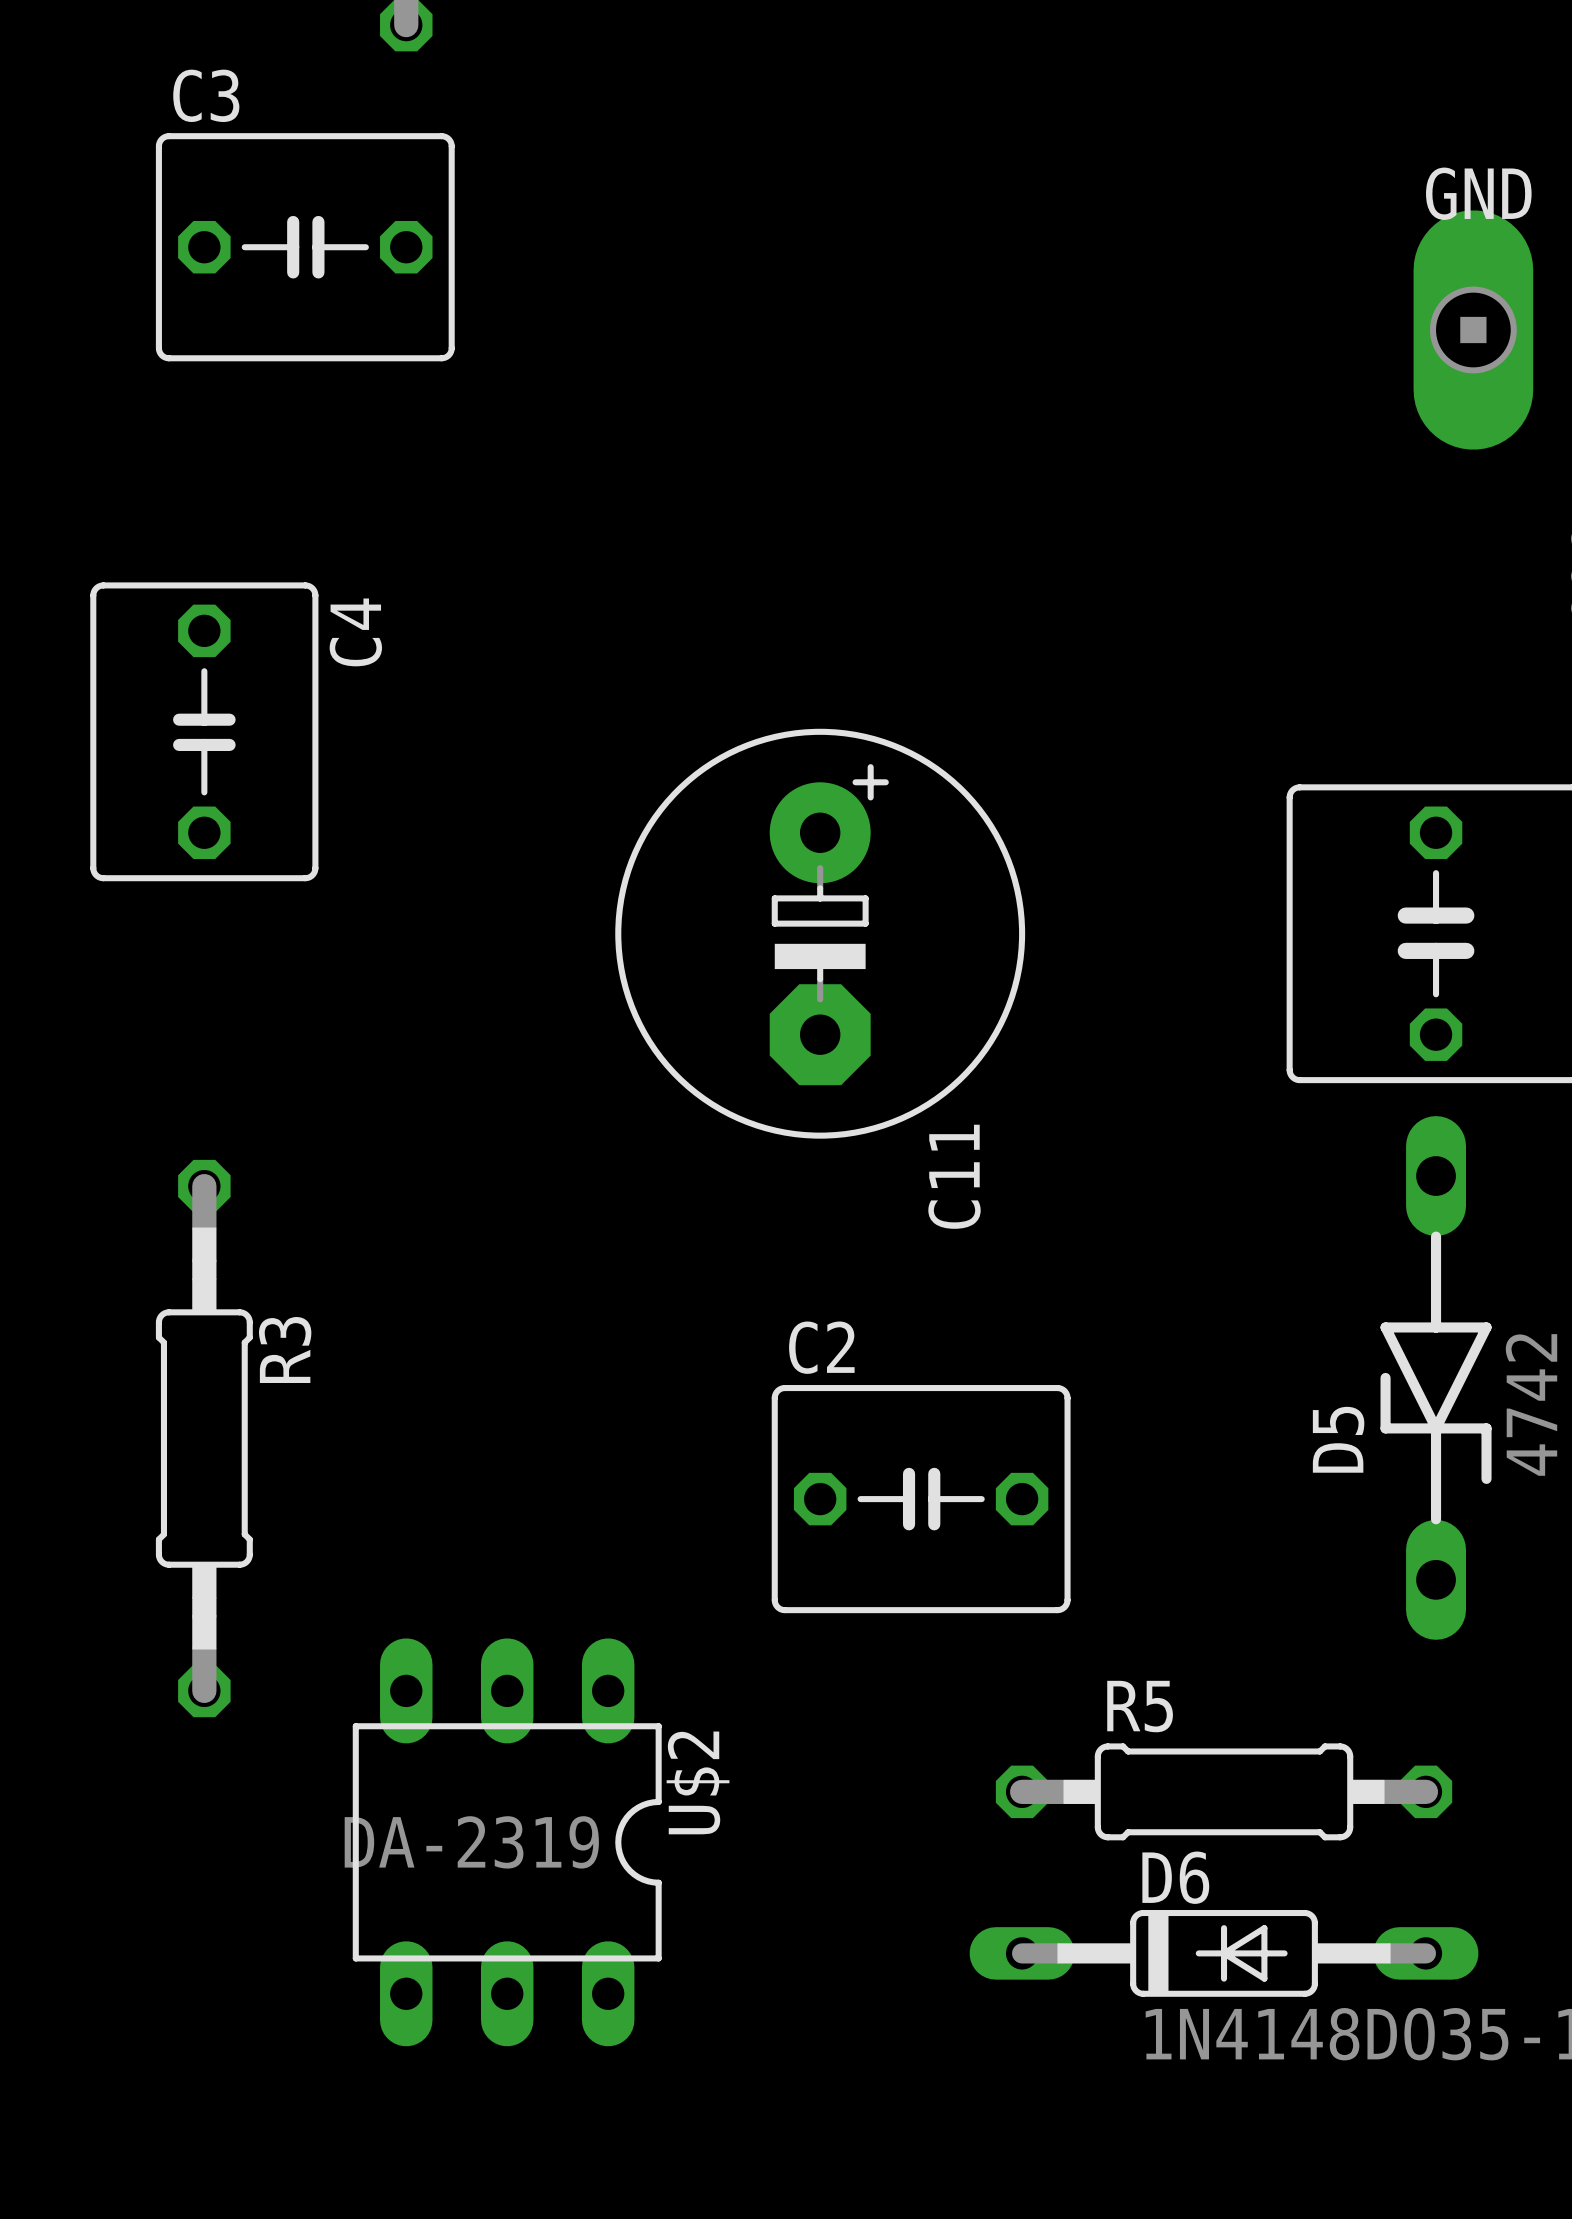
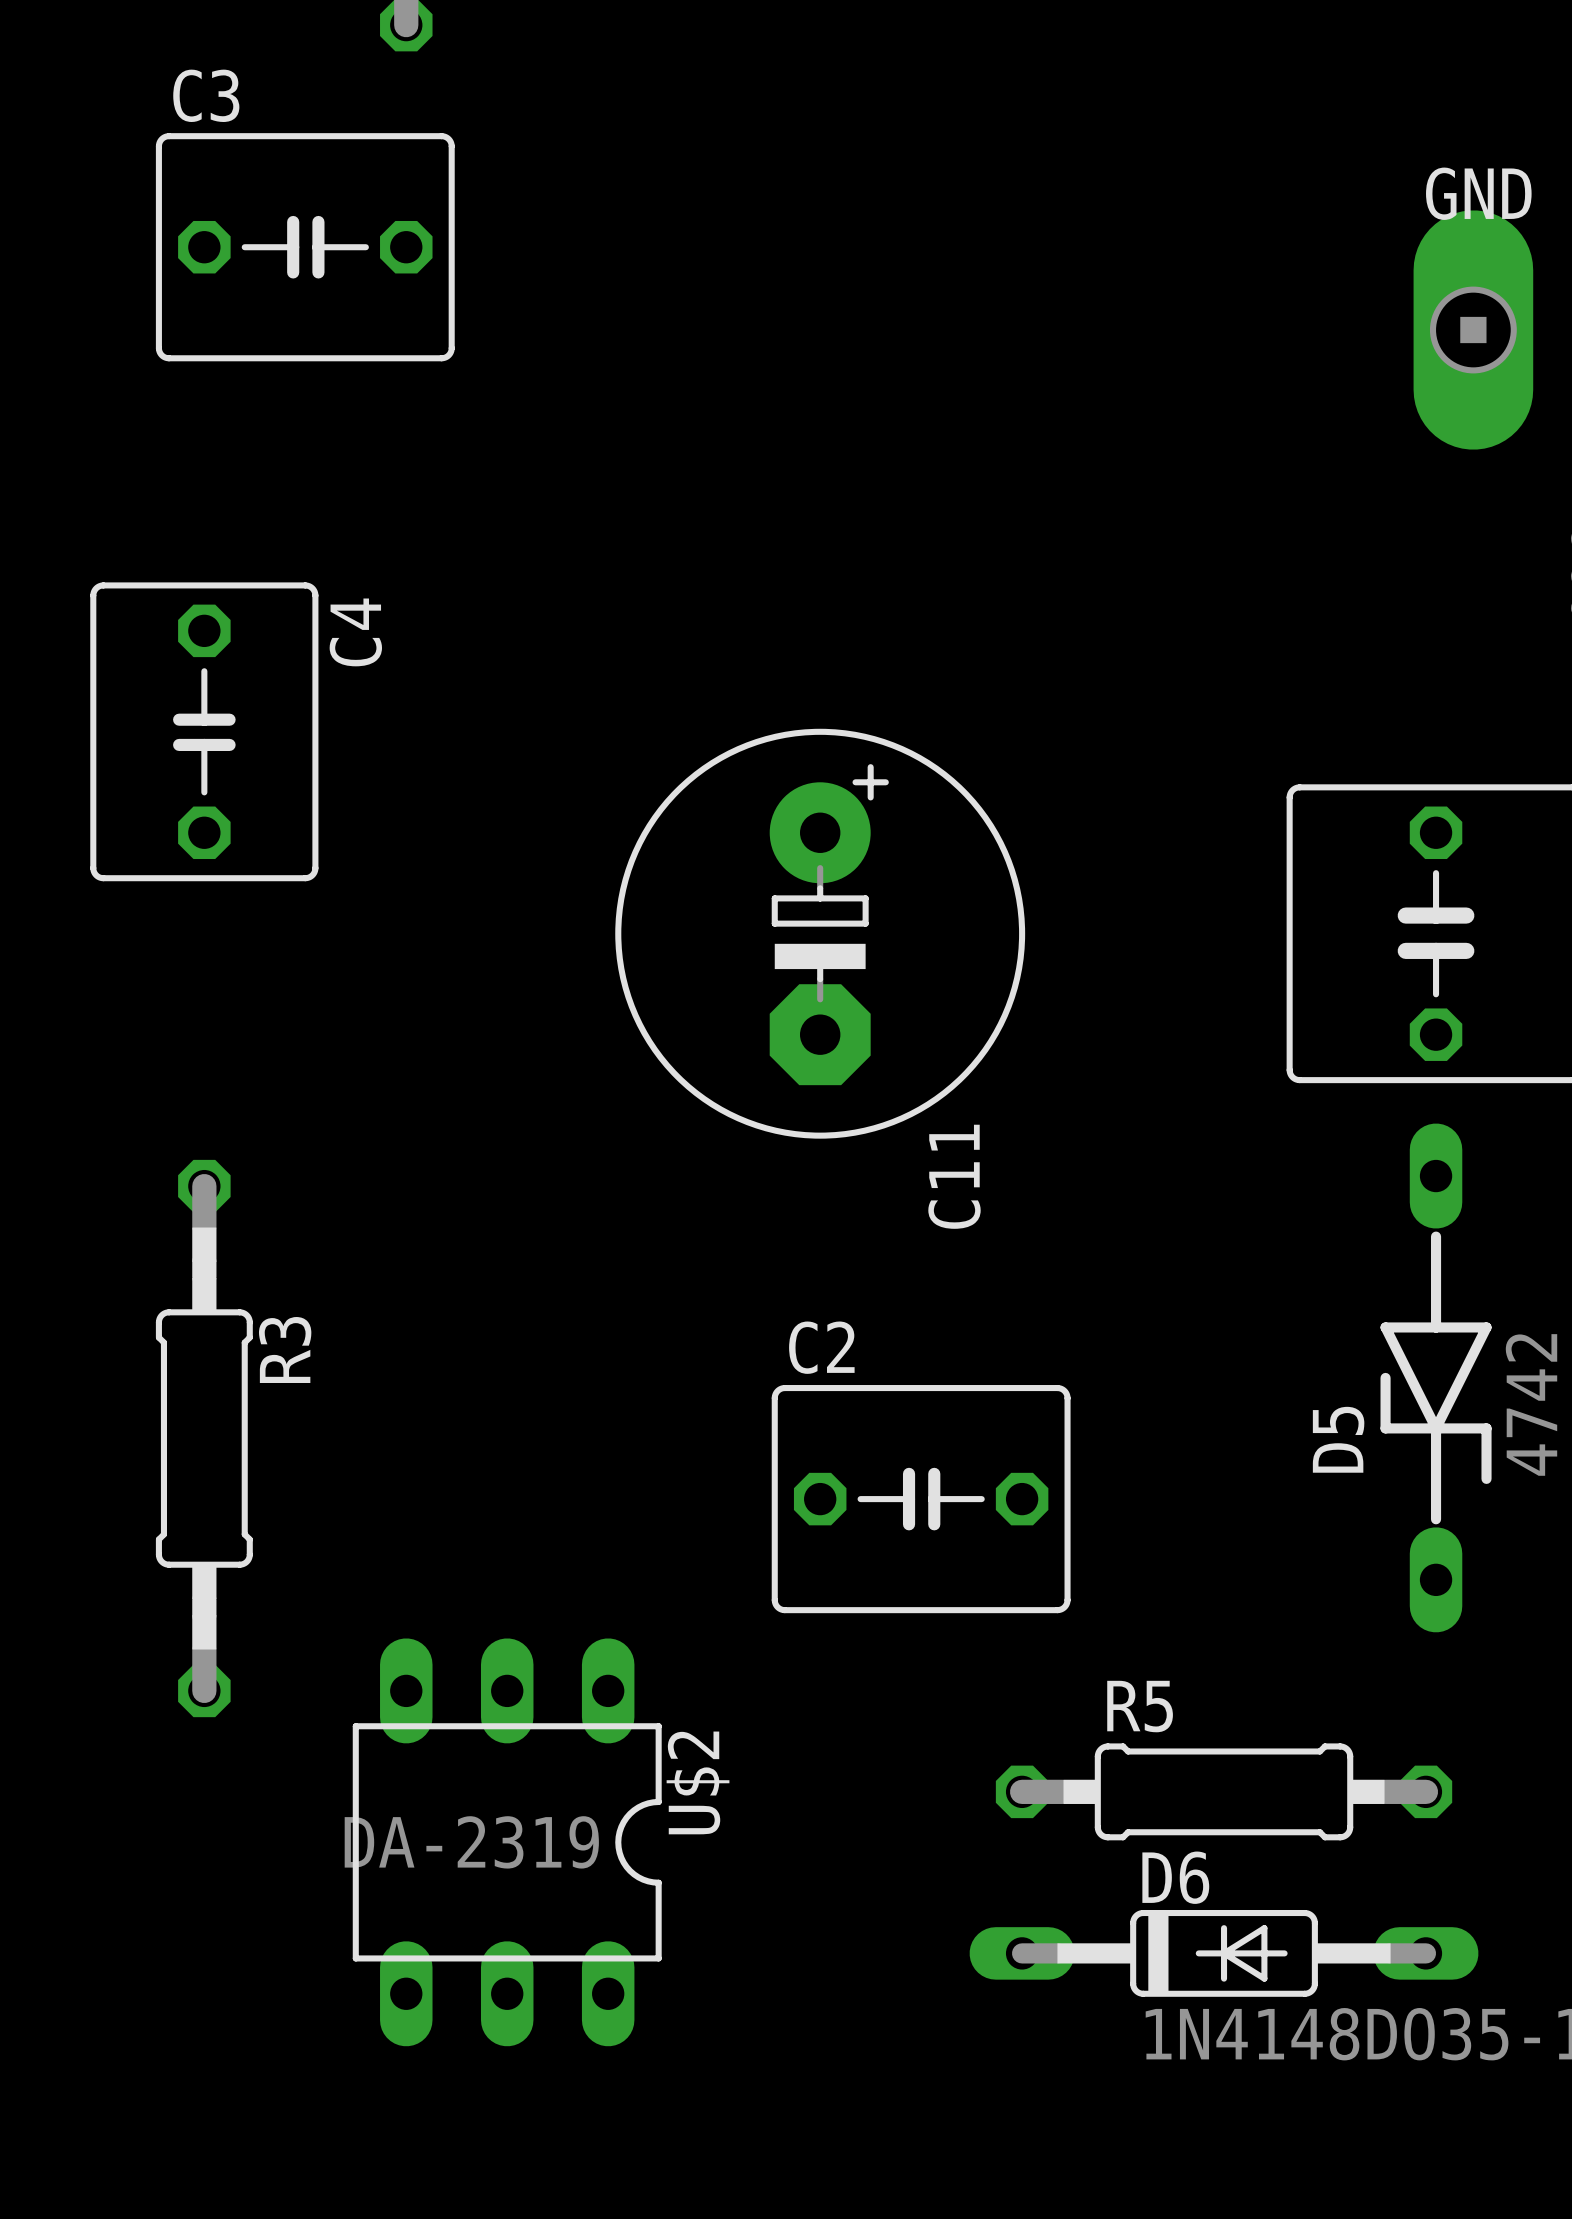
D5 footprint: [1380, 1116, 1492, 1640] -> [1380, 1123, 1492, 1633]

